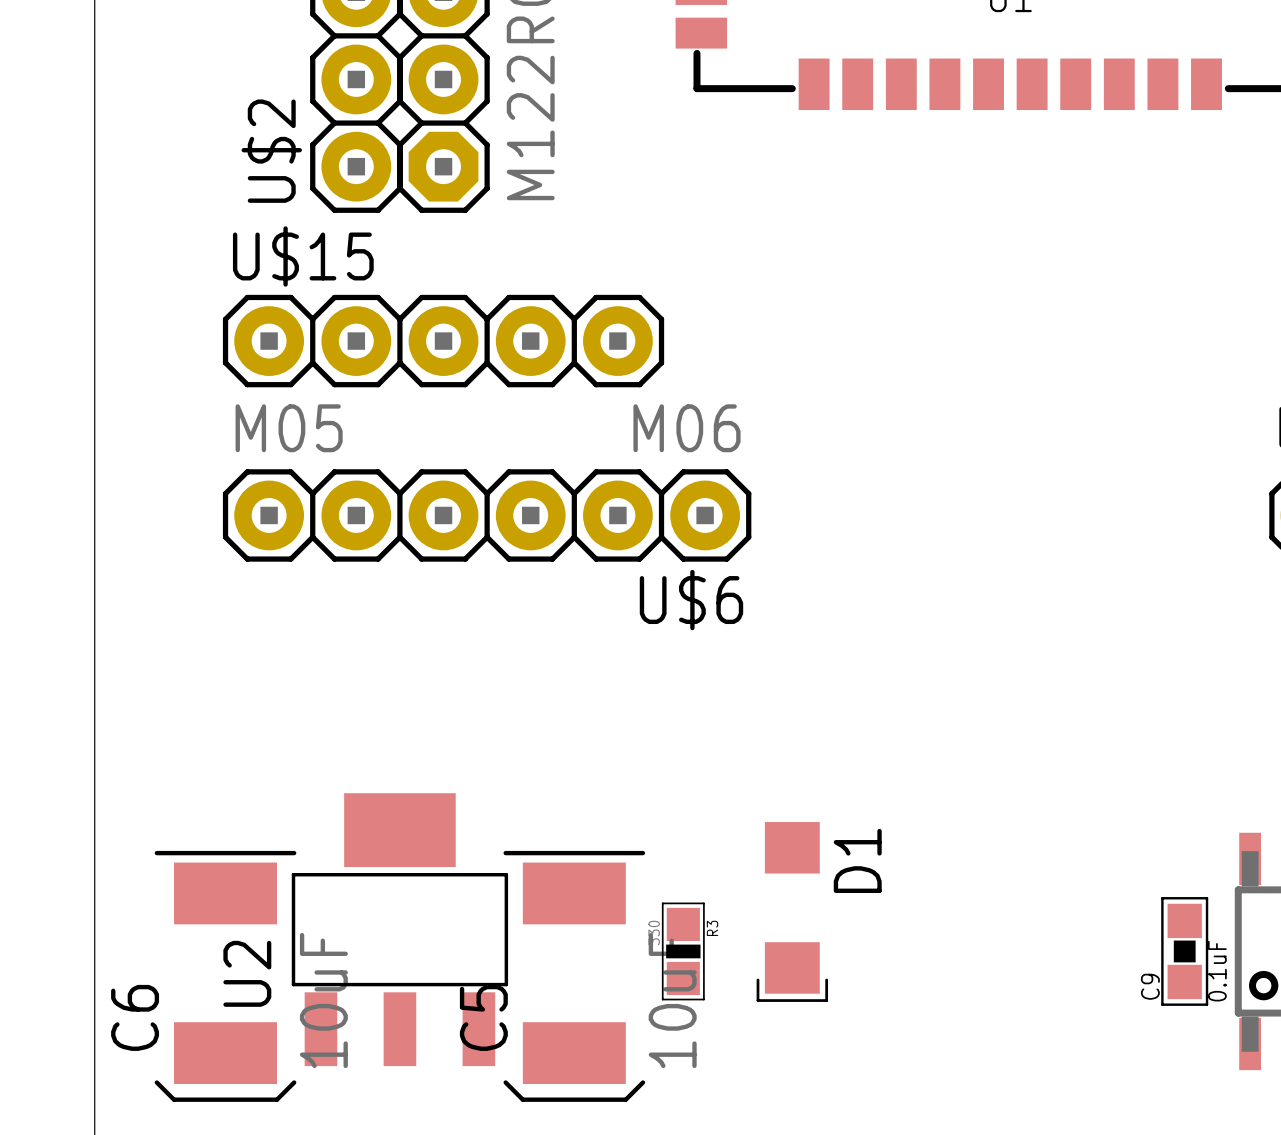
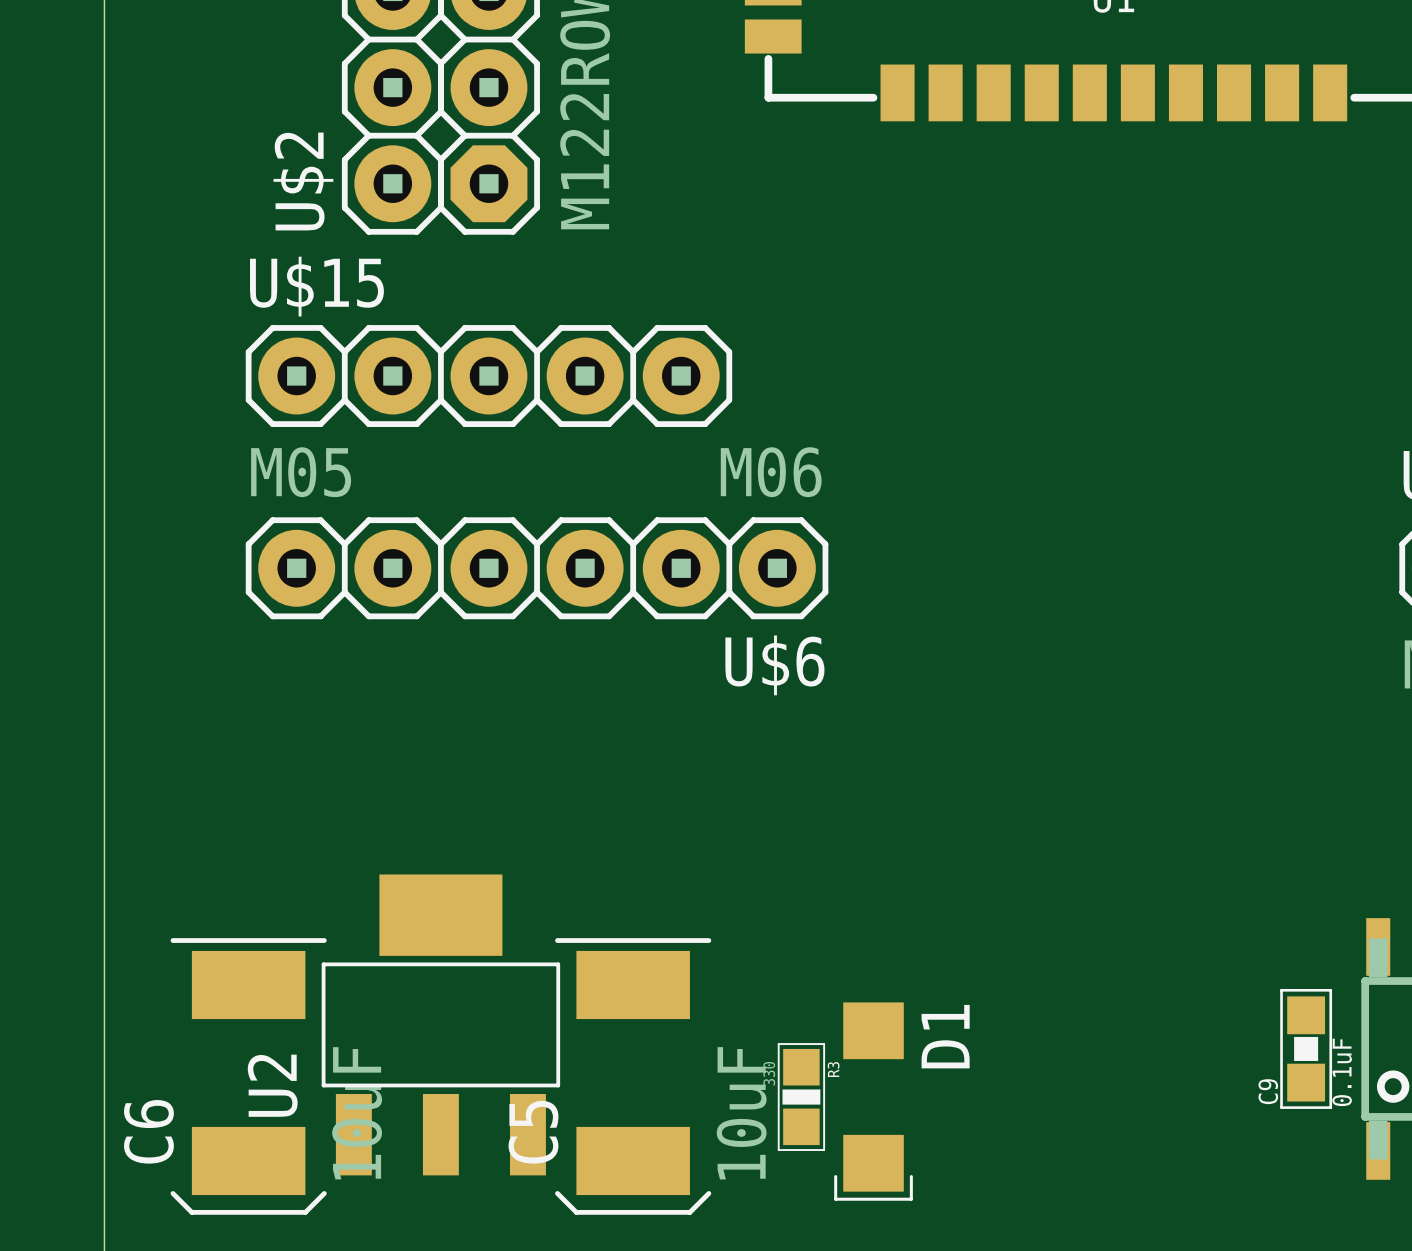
D1 position: (792, 911) -> (873, 1101)
R3 position: (683, 951) -> (801, 1097)

